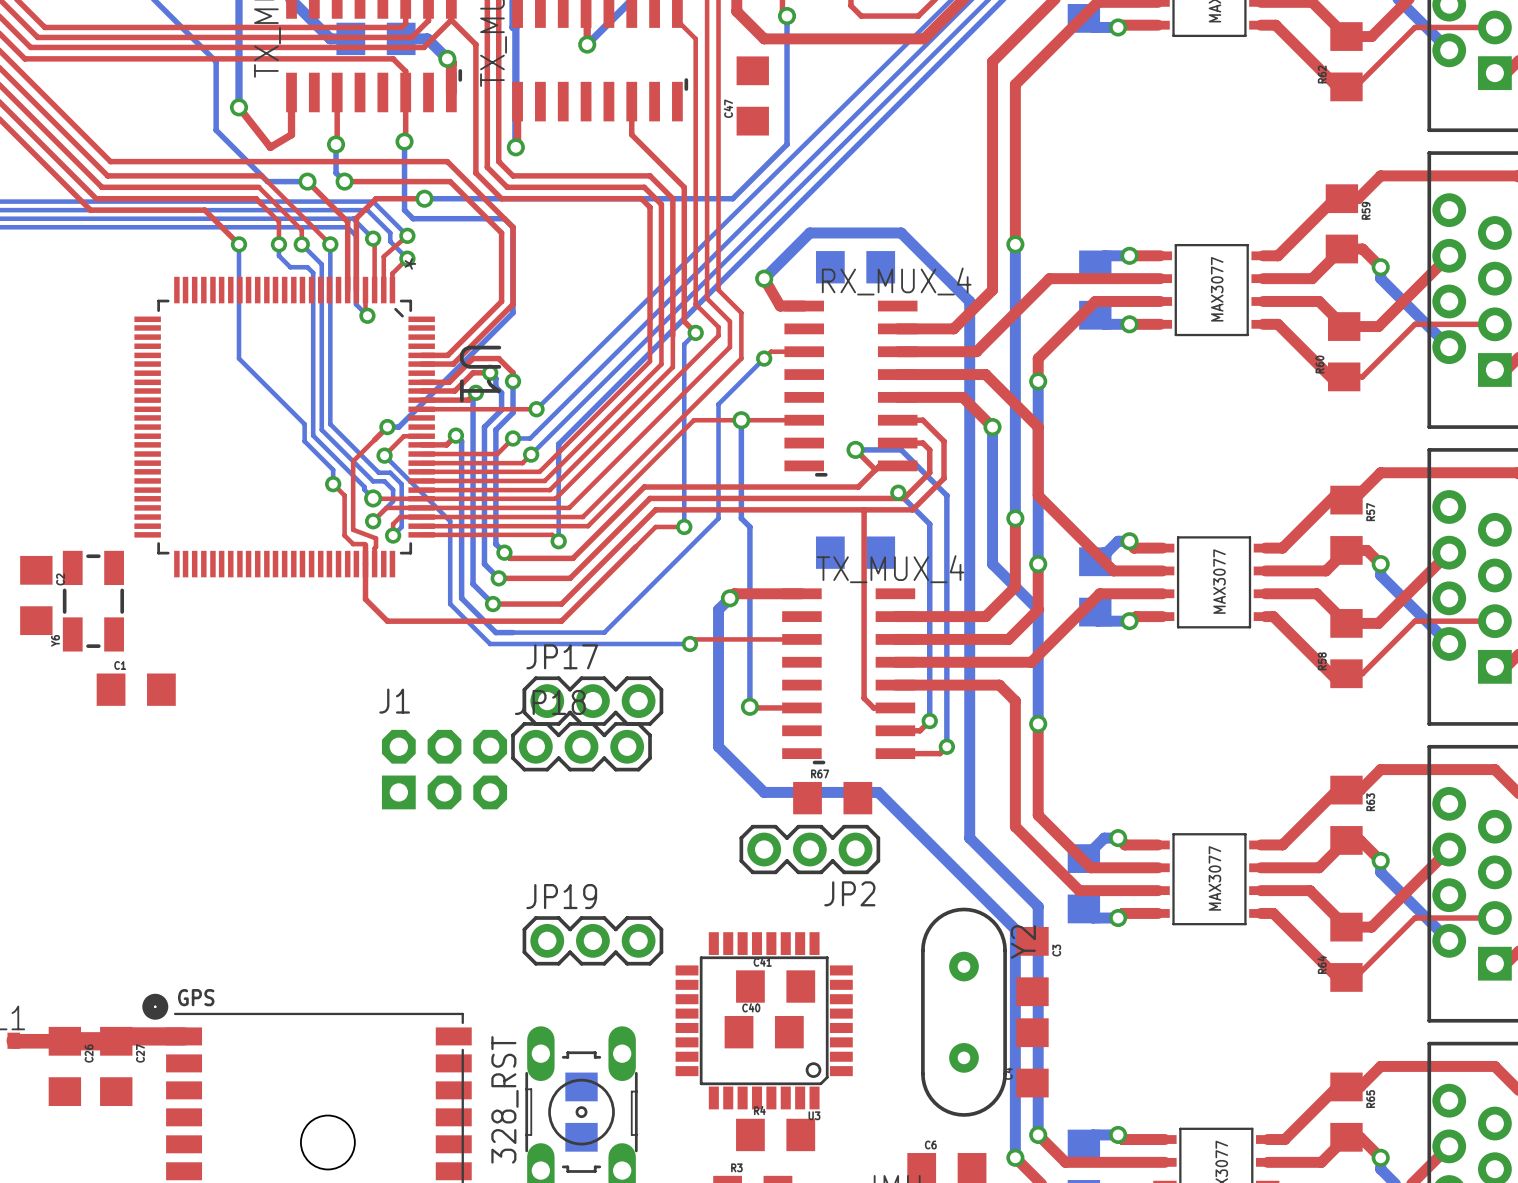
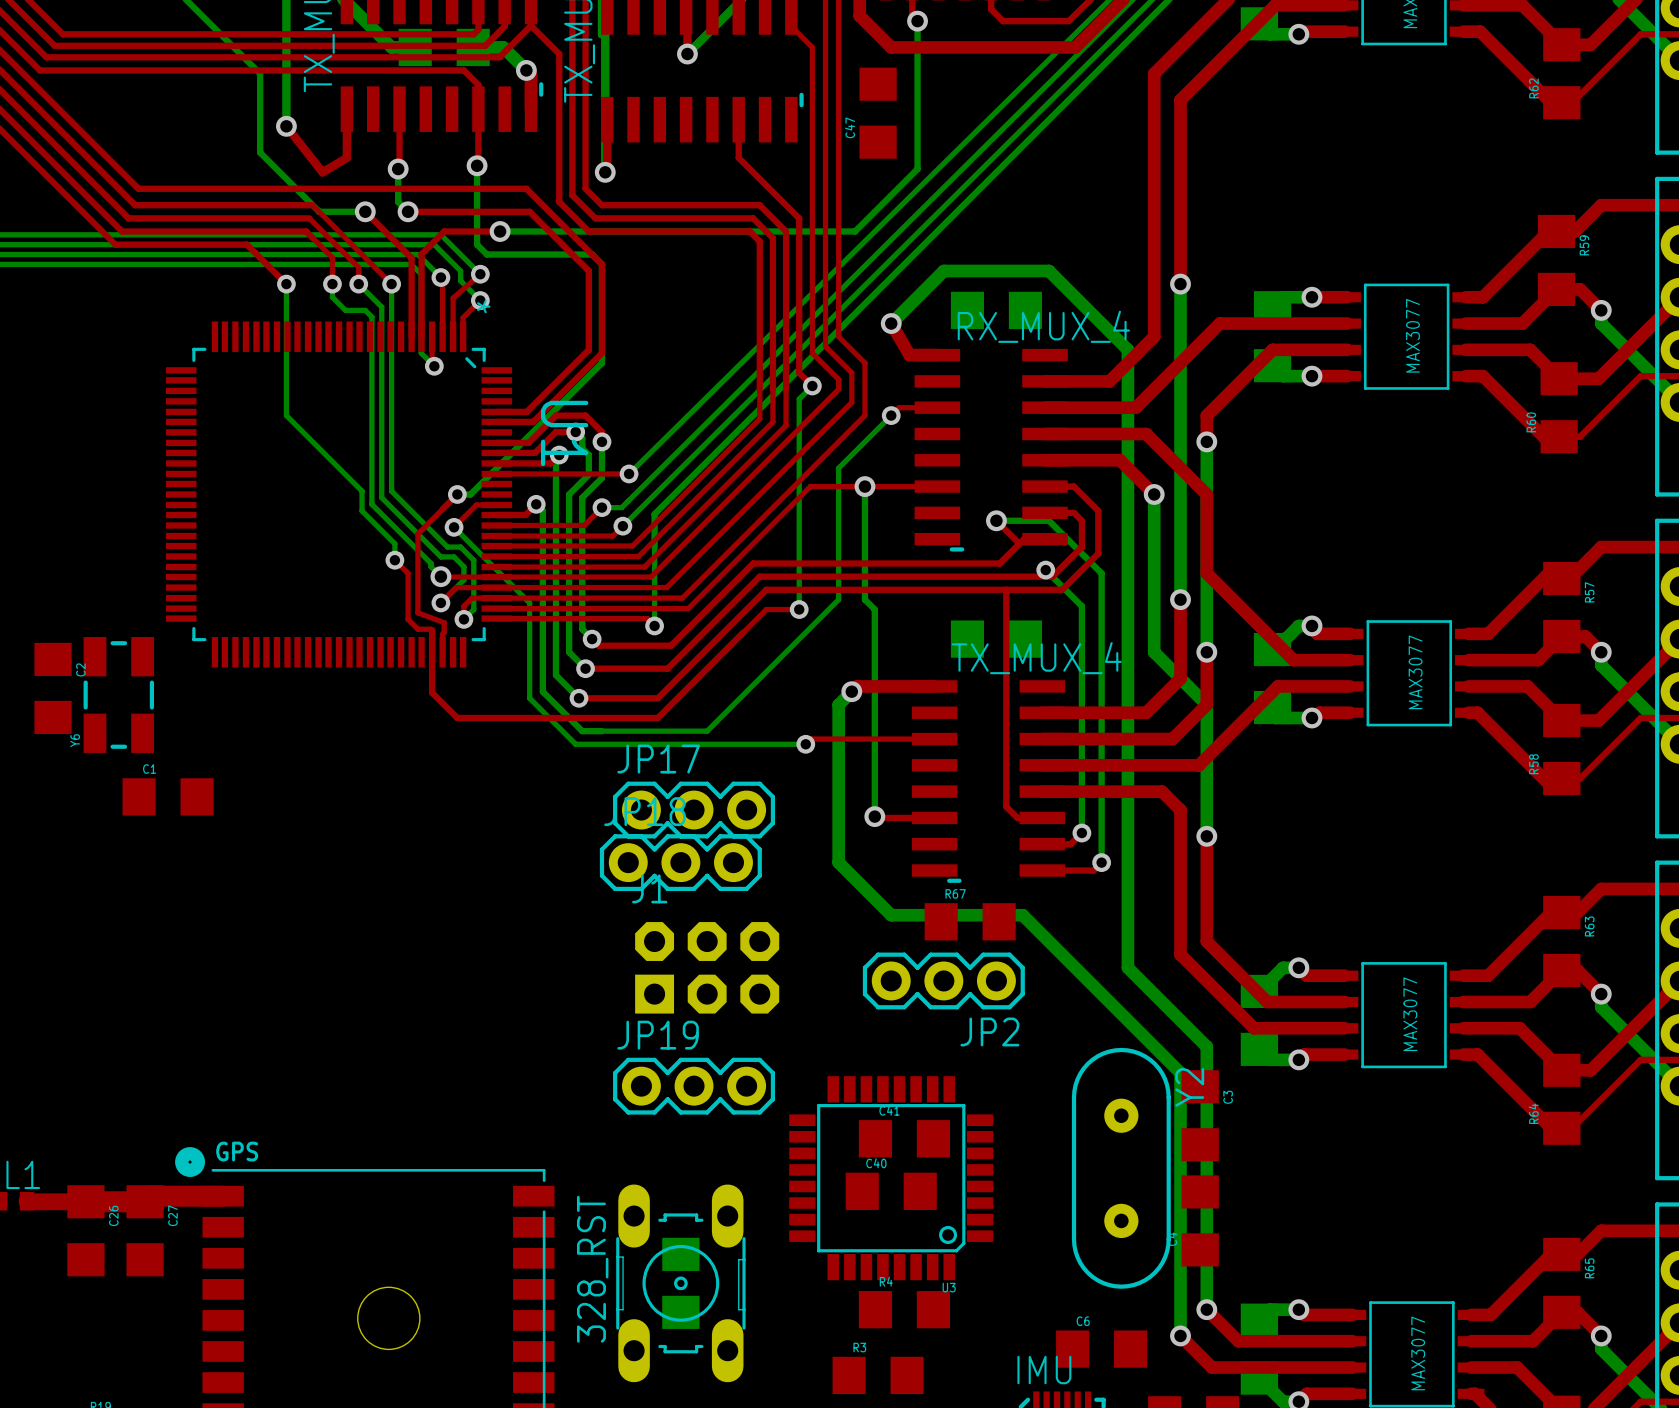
J1 position: (444, 769) -> (707, 967)

